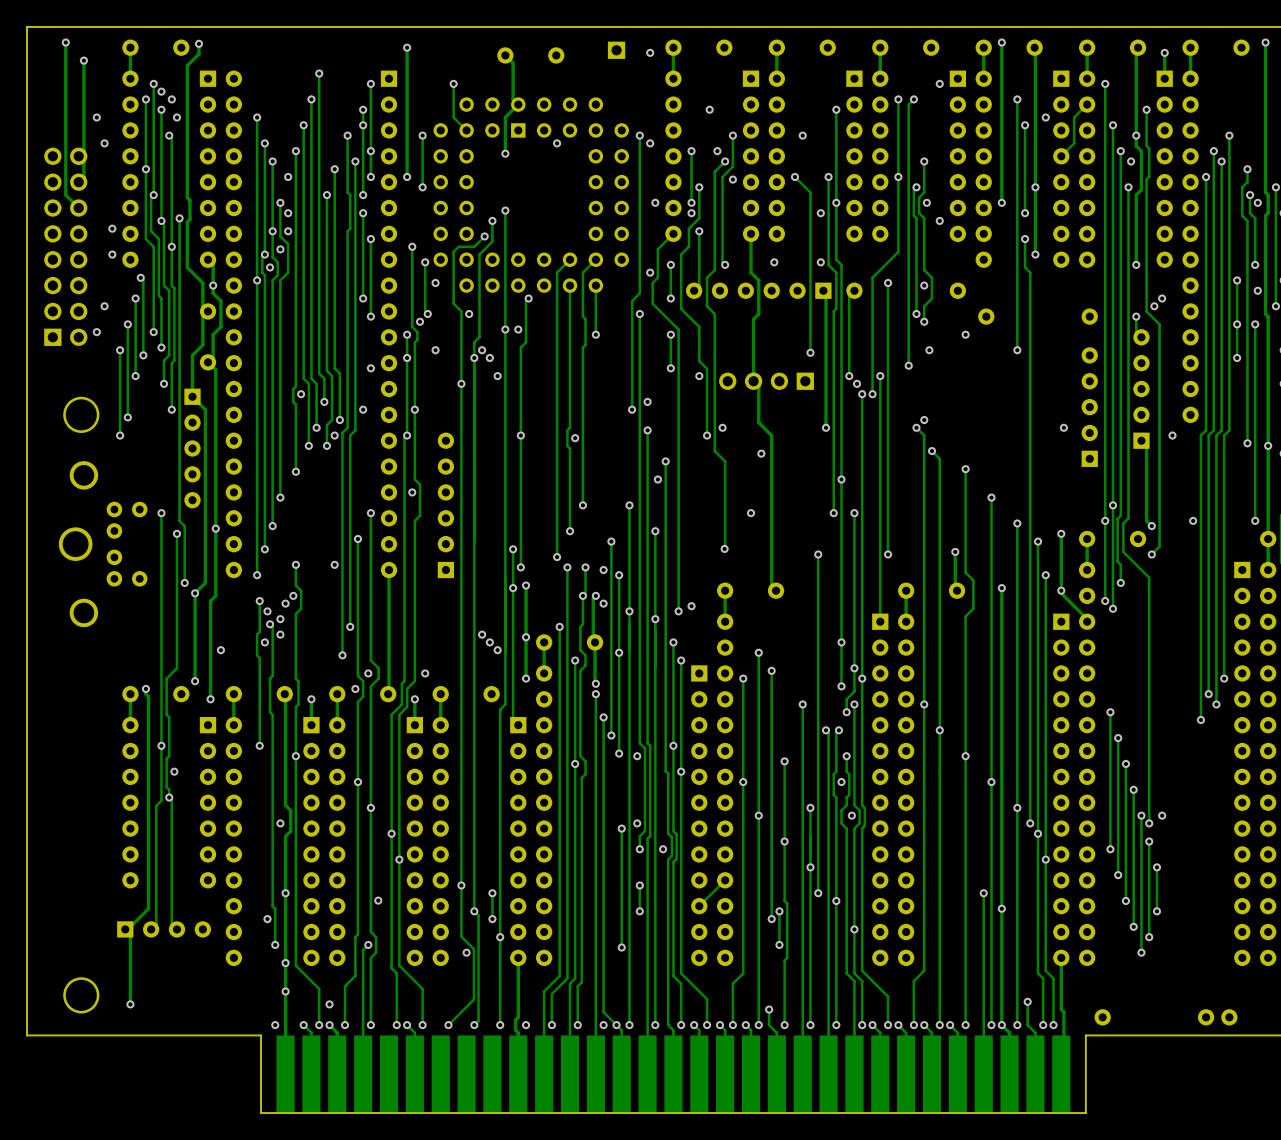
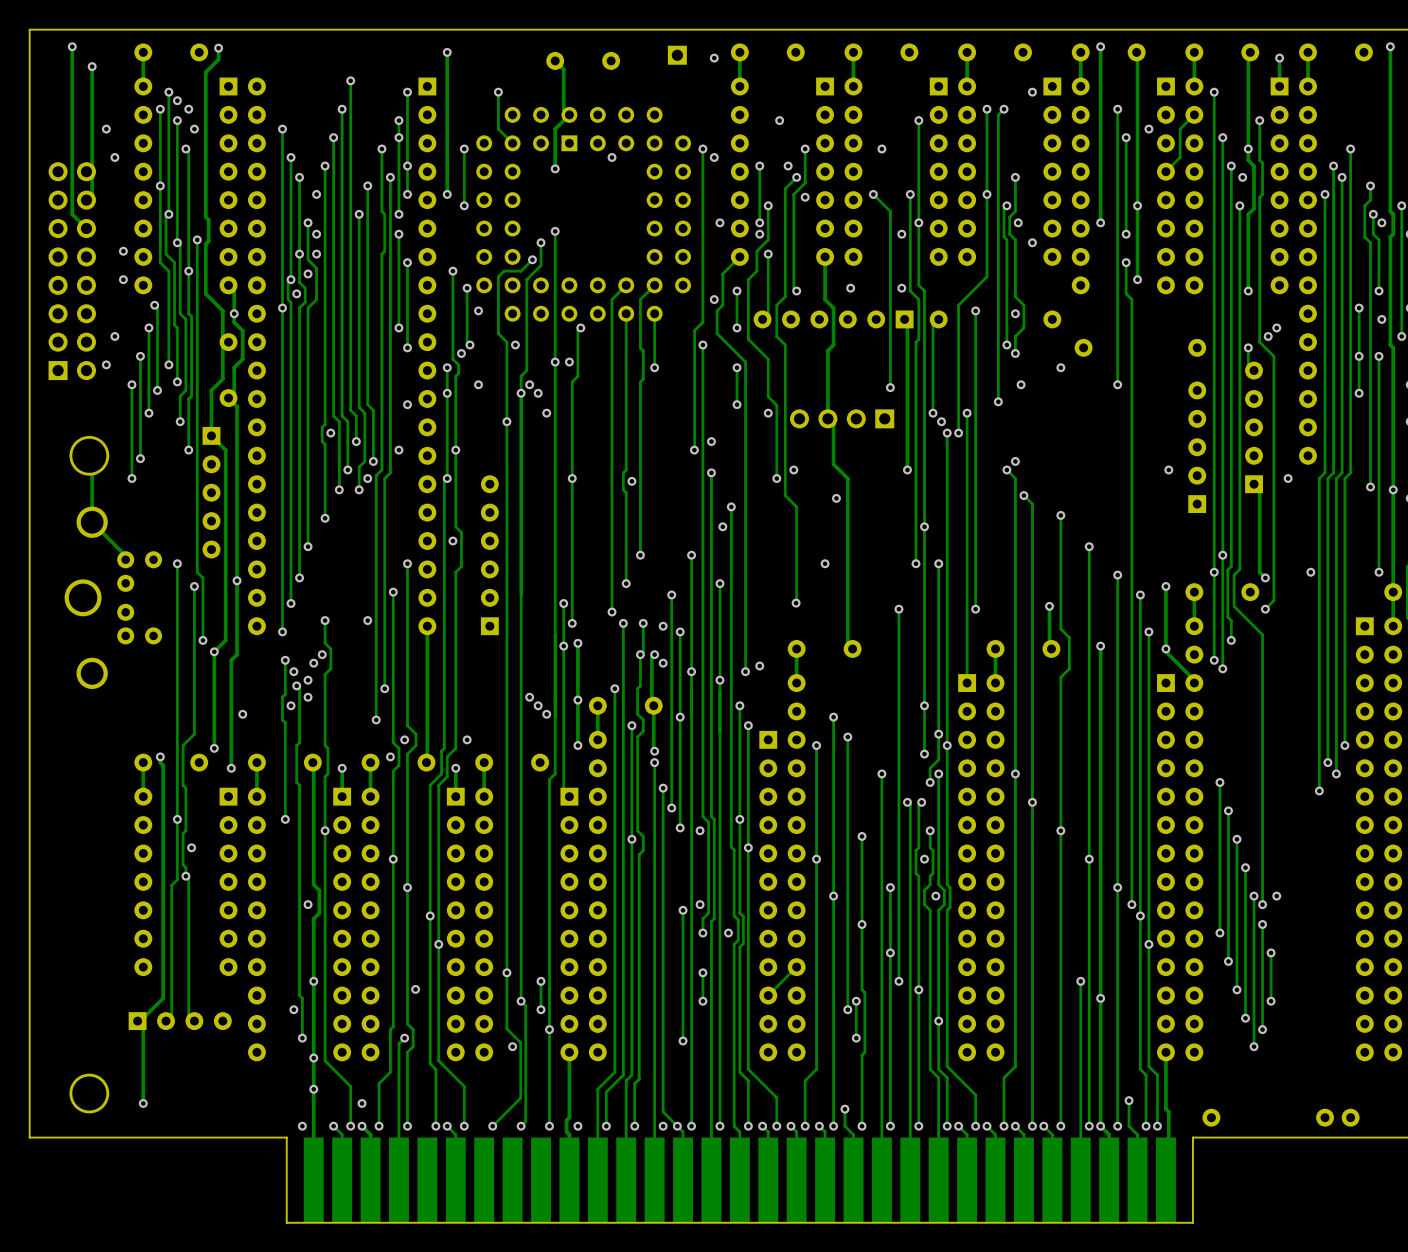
track: none -> (89, 455) (89, 467) (92, 469) (92, 522) (125, 555)

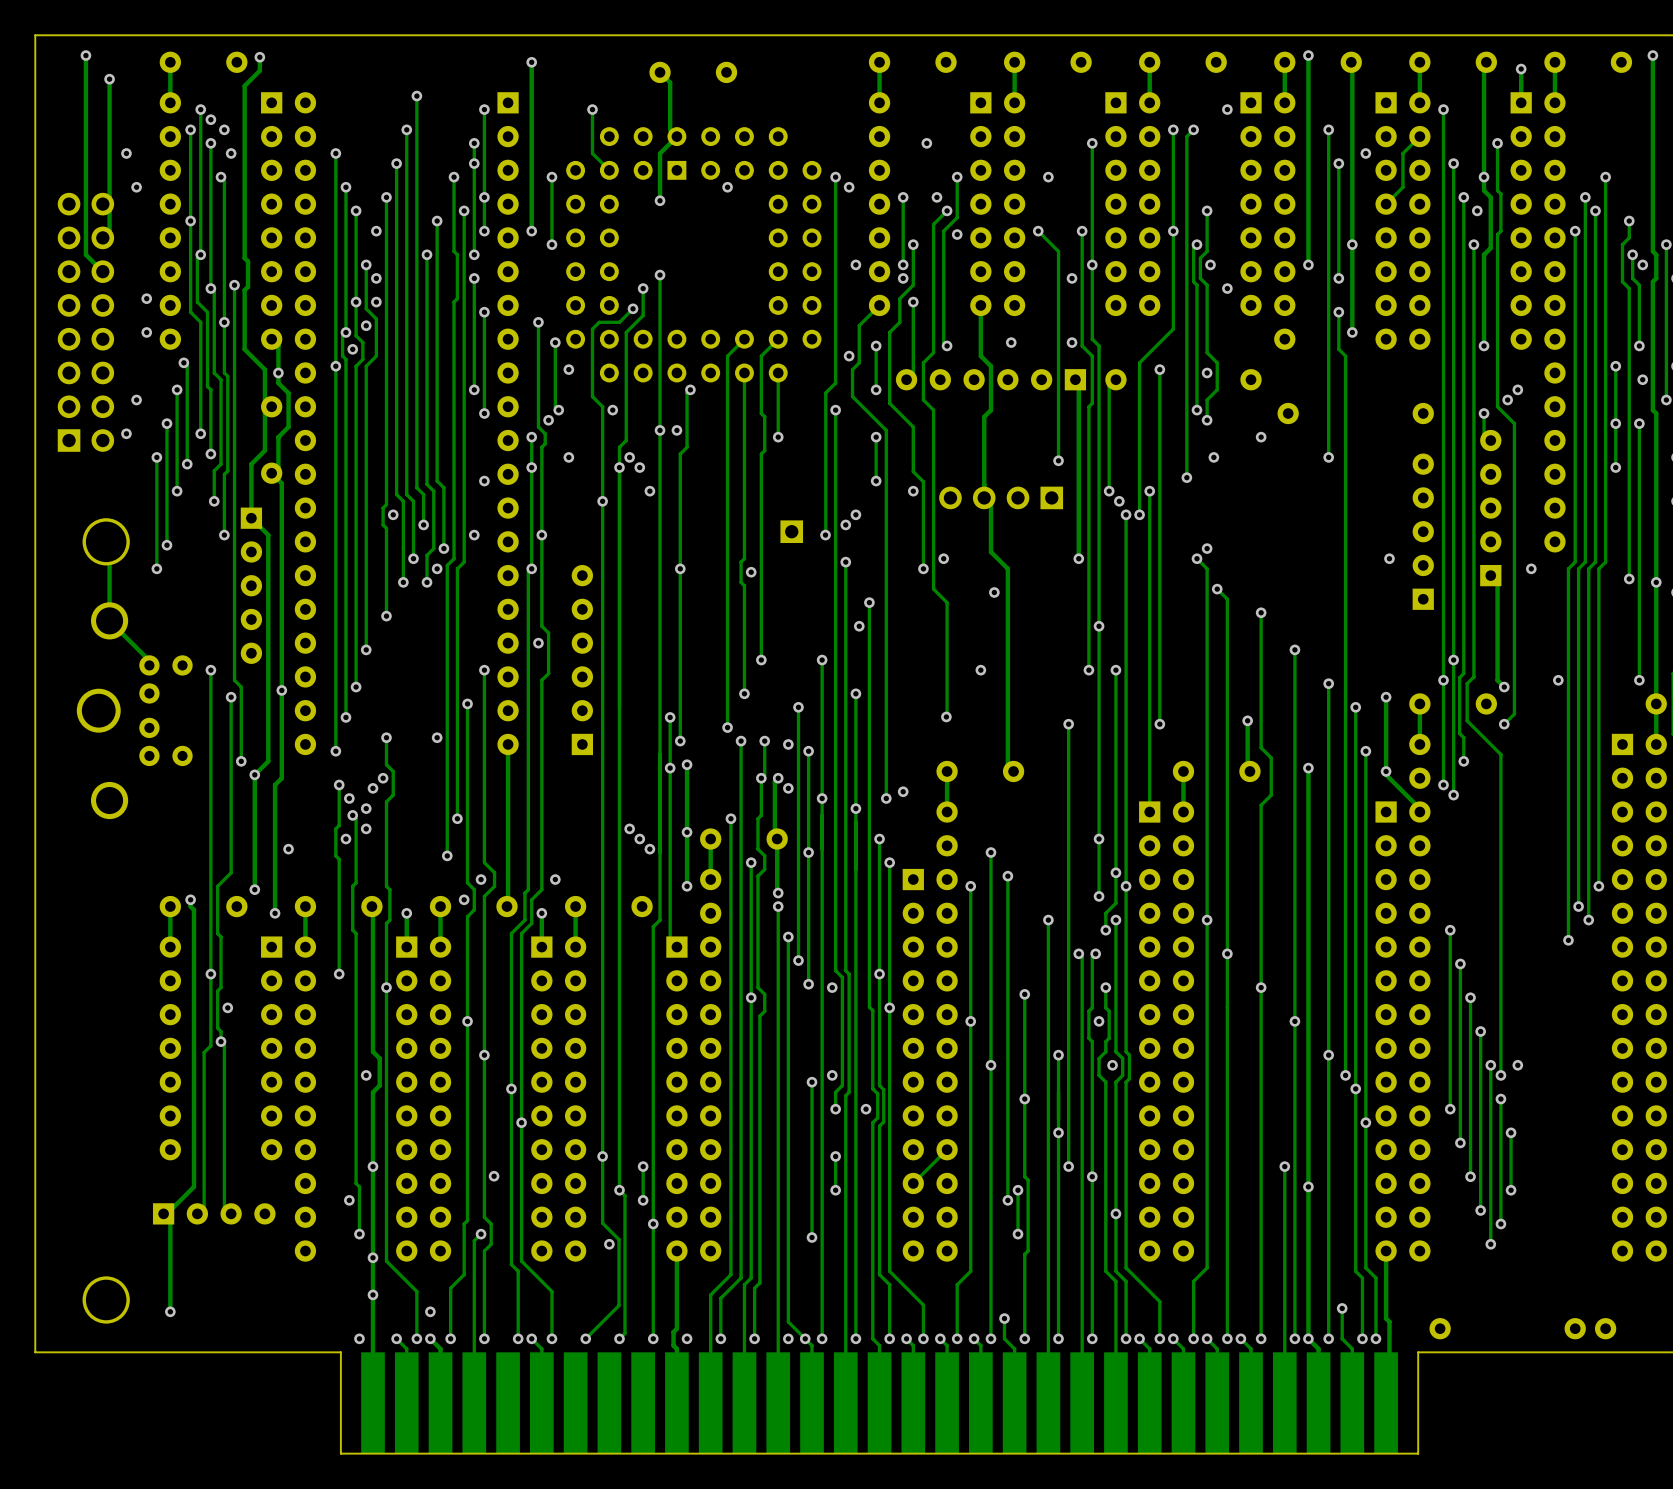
part: (677, 55) -> none
via: (714, 58) -> none
via: none -> (855, 514)
part: none -> (791, 531)

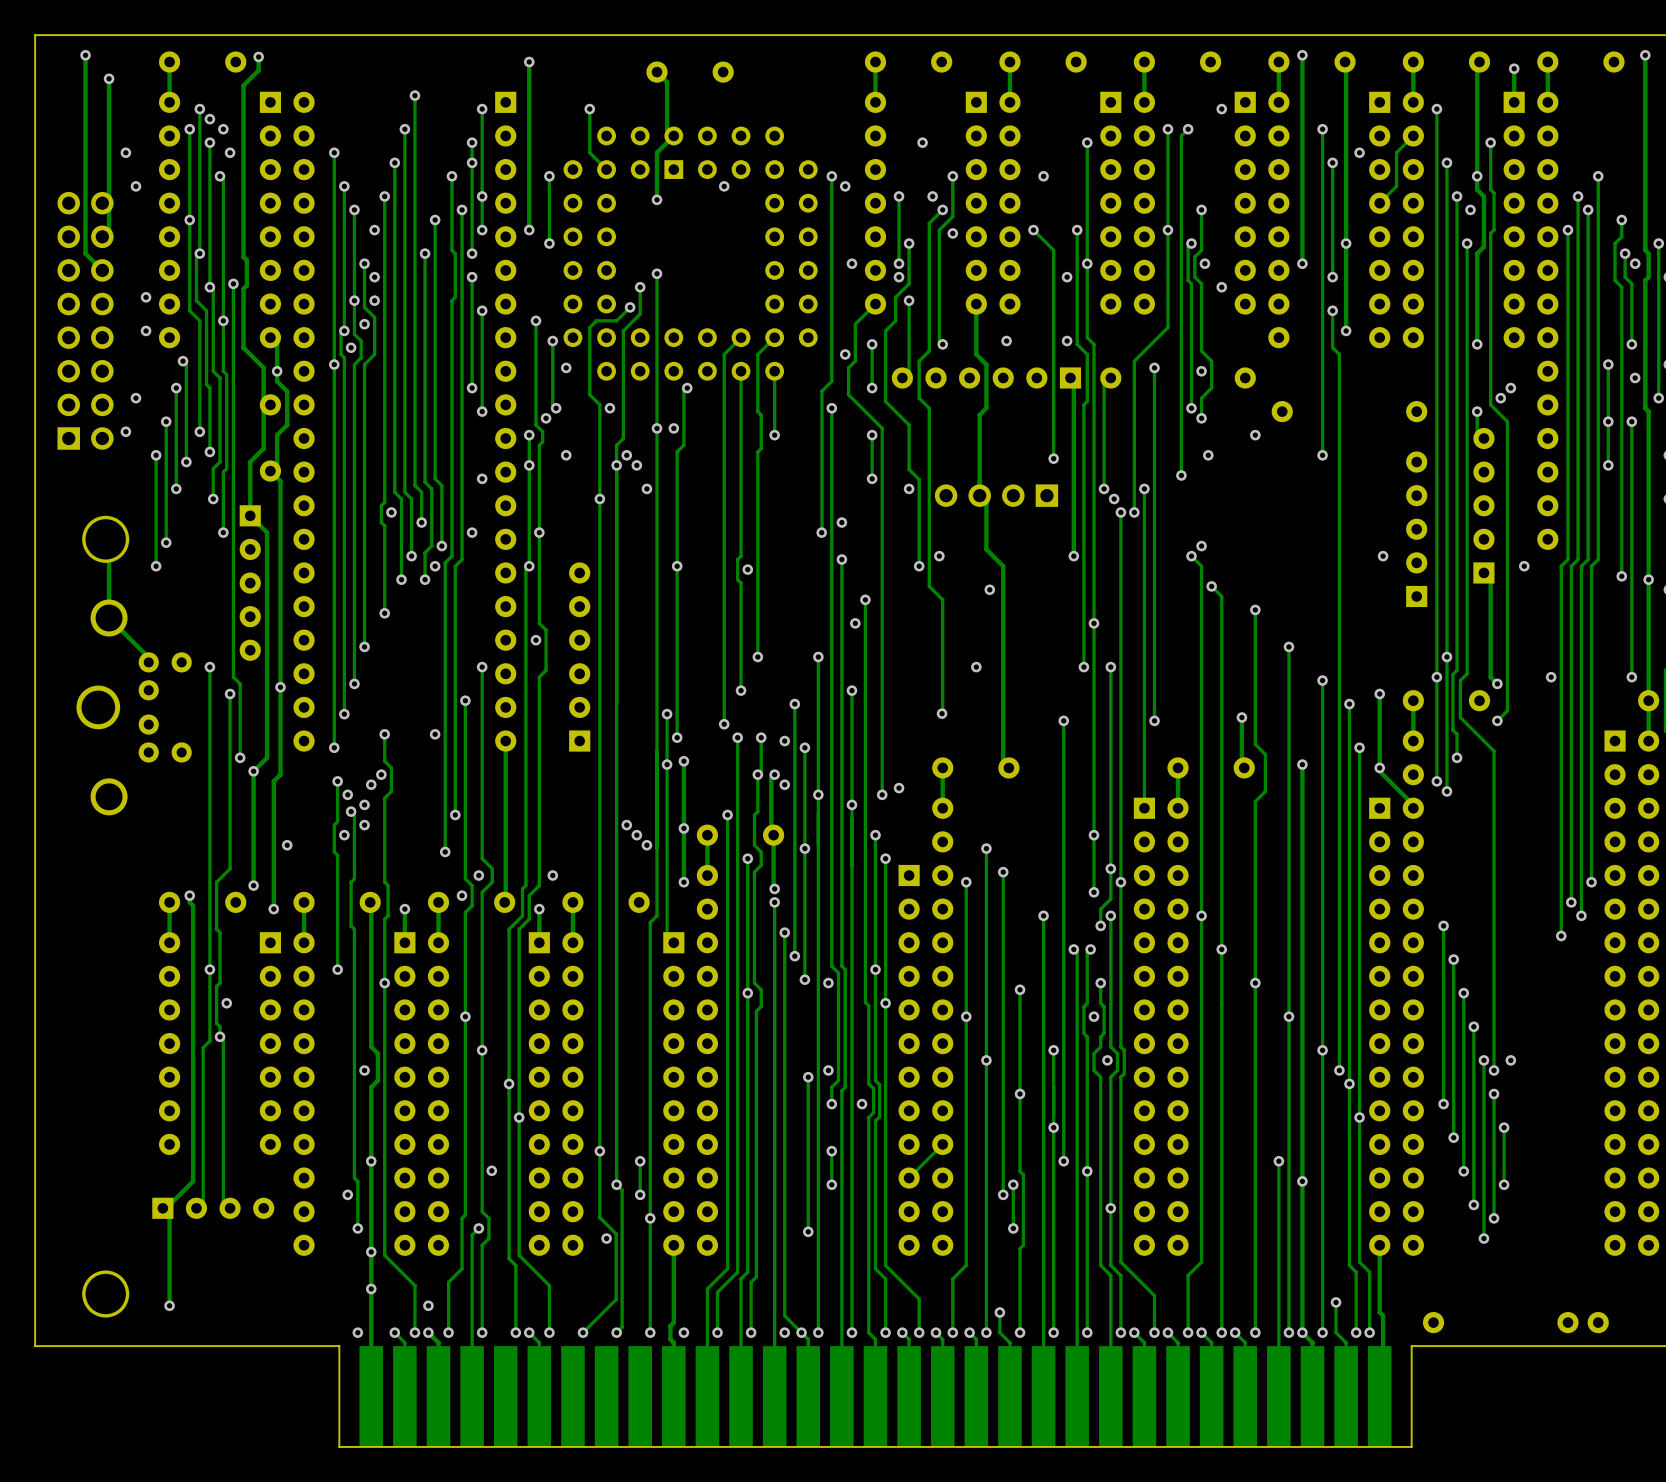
via: (855, 514) -> none
part: (791, 531) -> none

